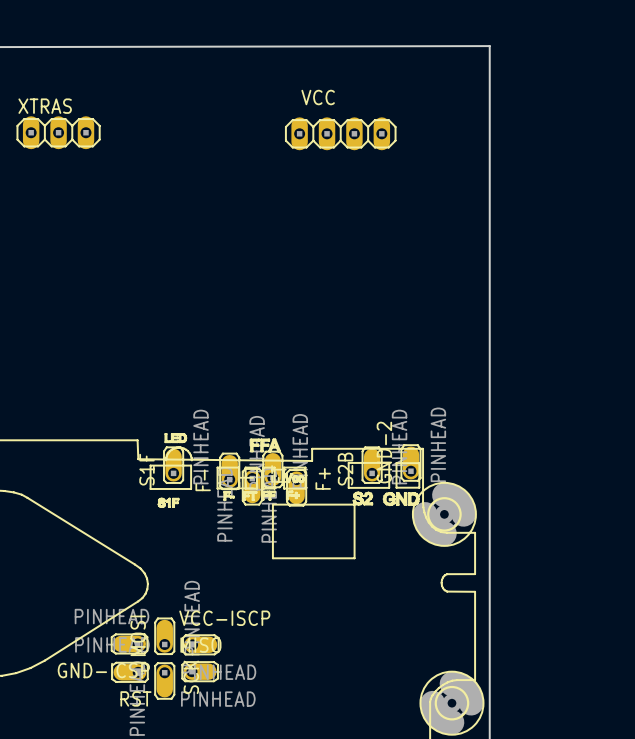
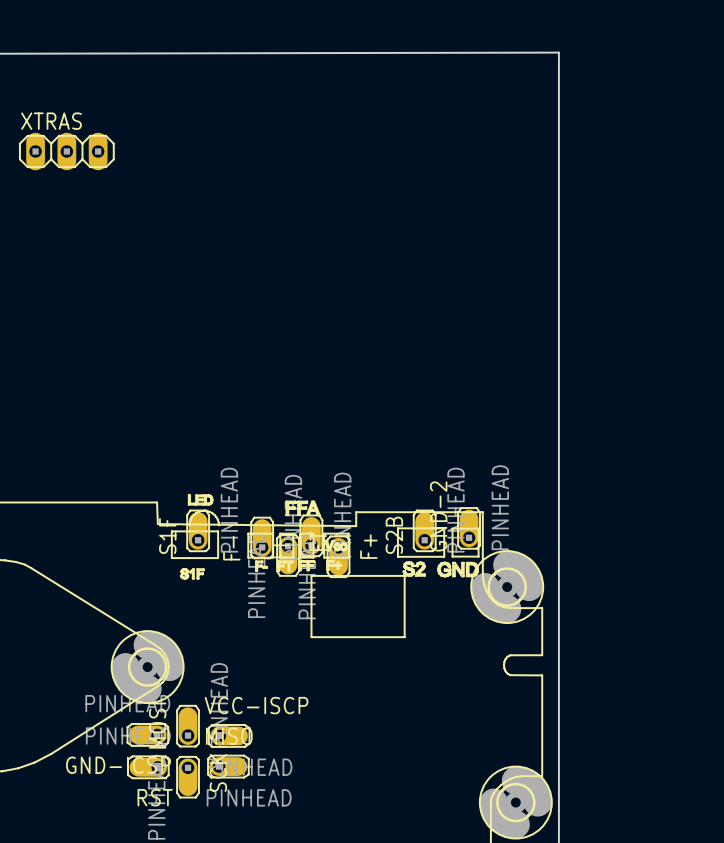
VCC: (340, 133) -> none
part: none -> (147, 667)

